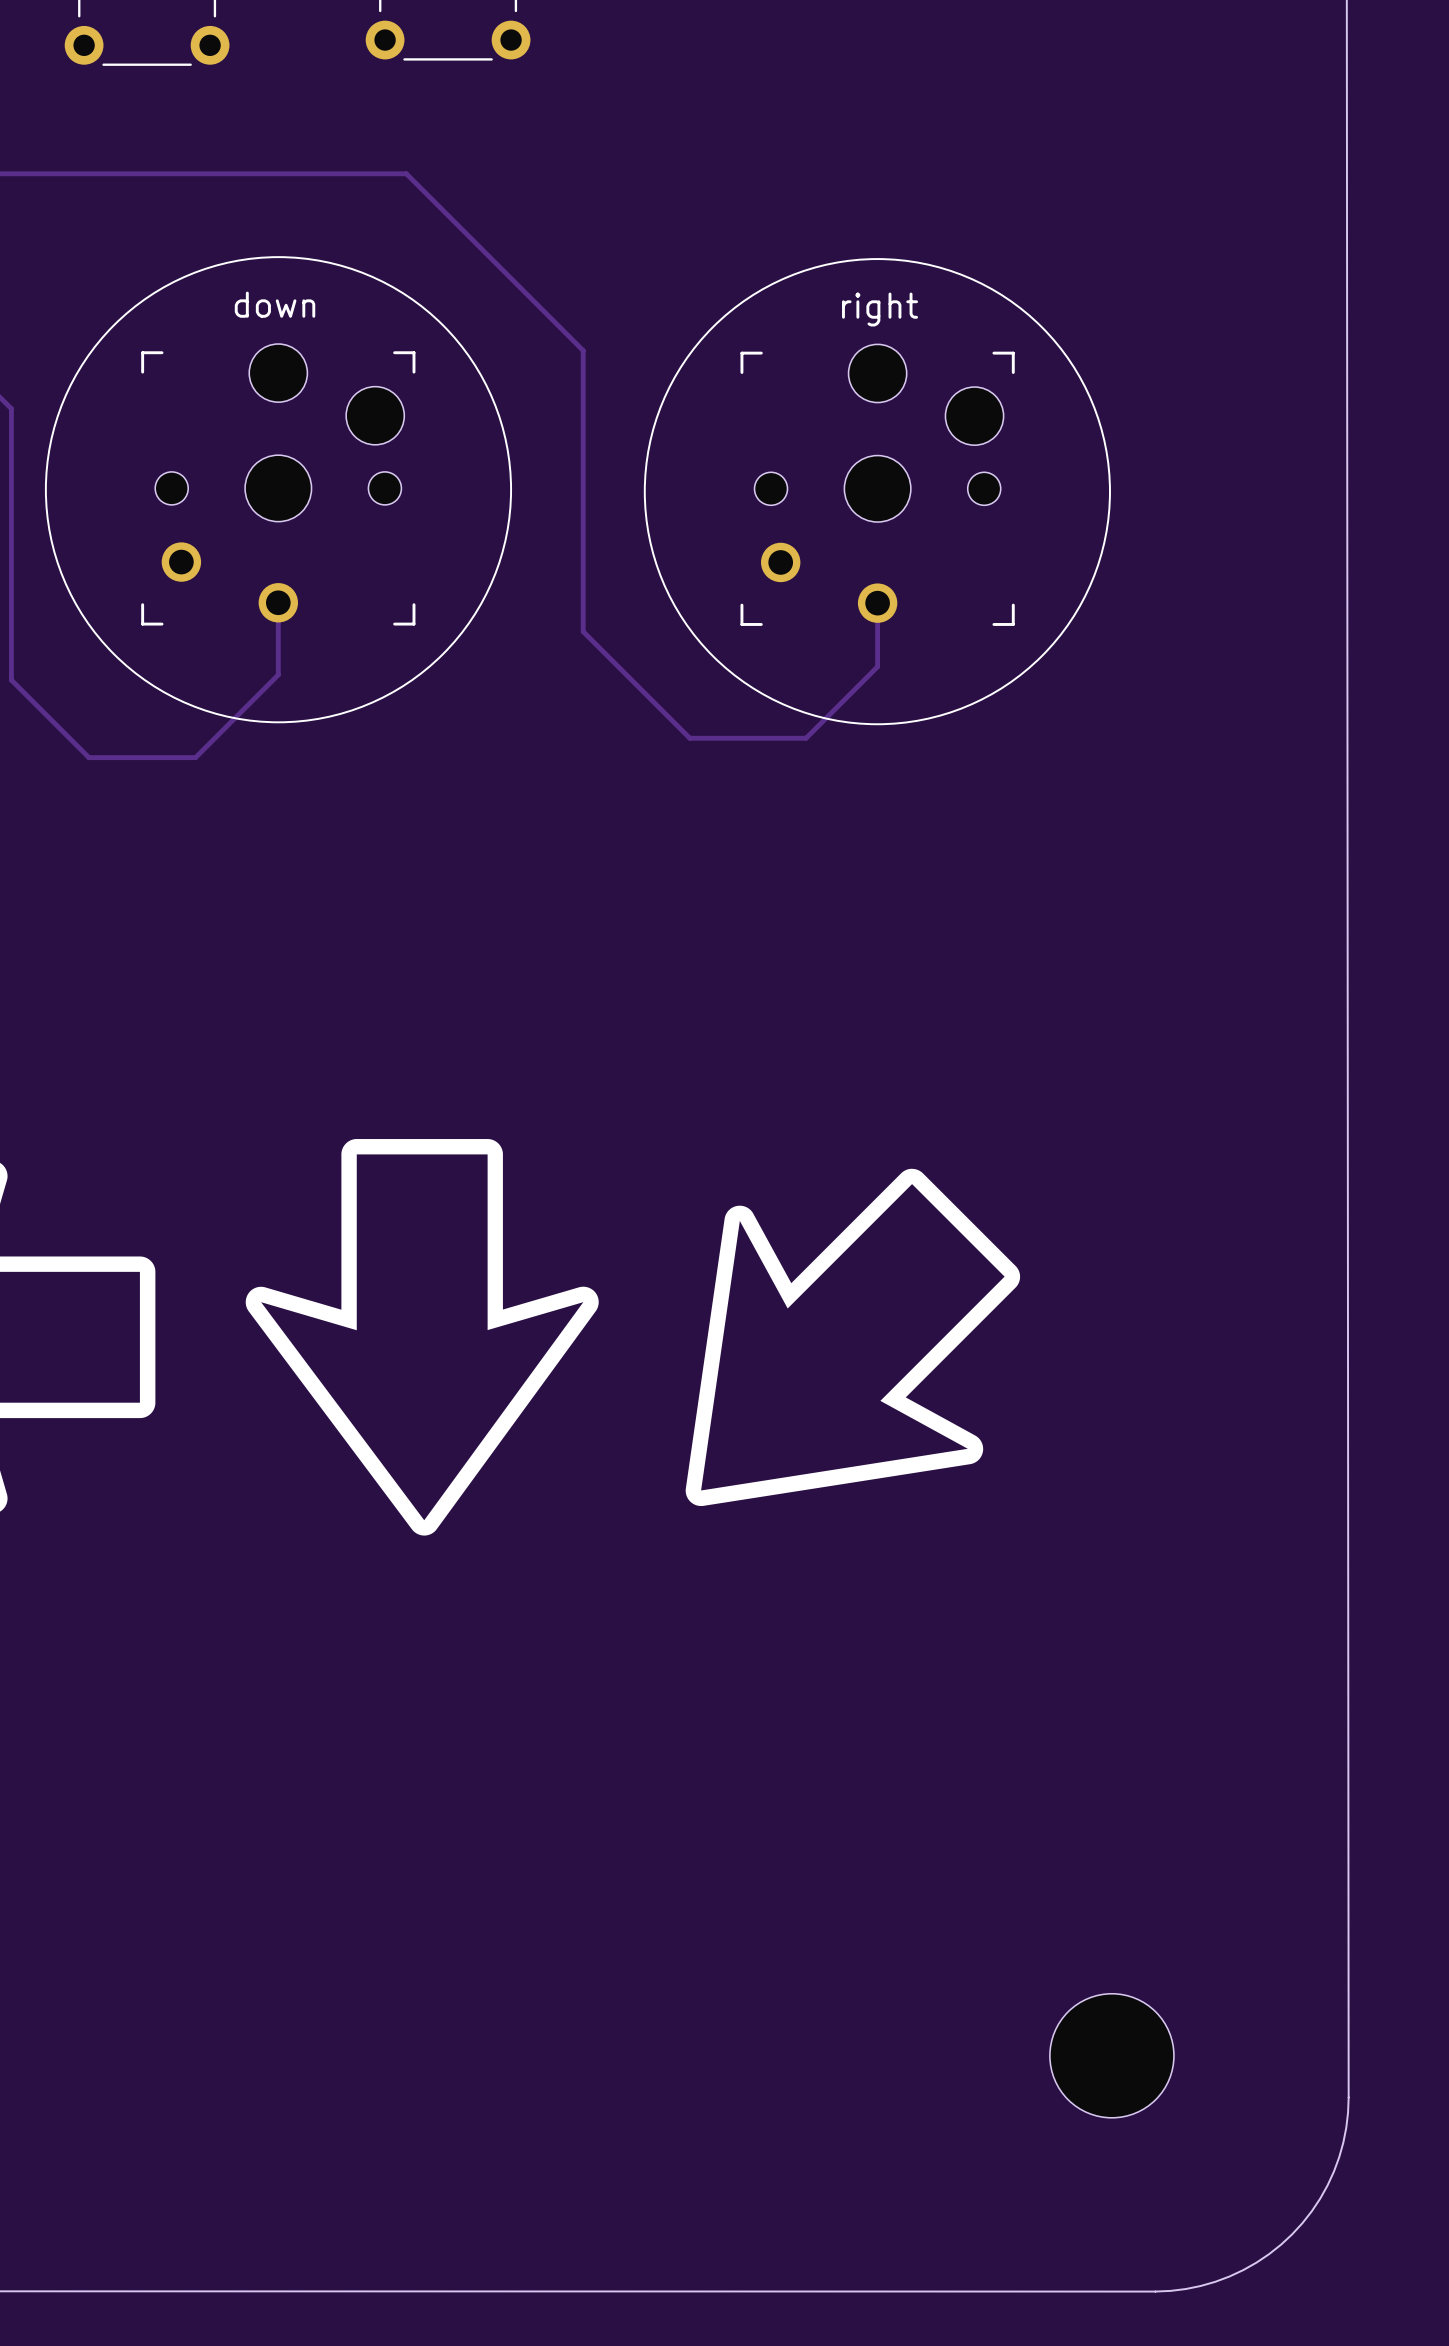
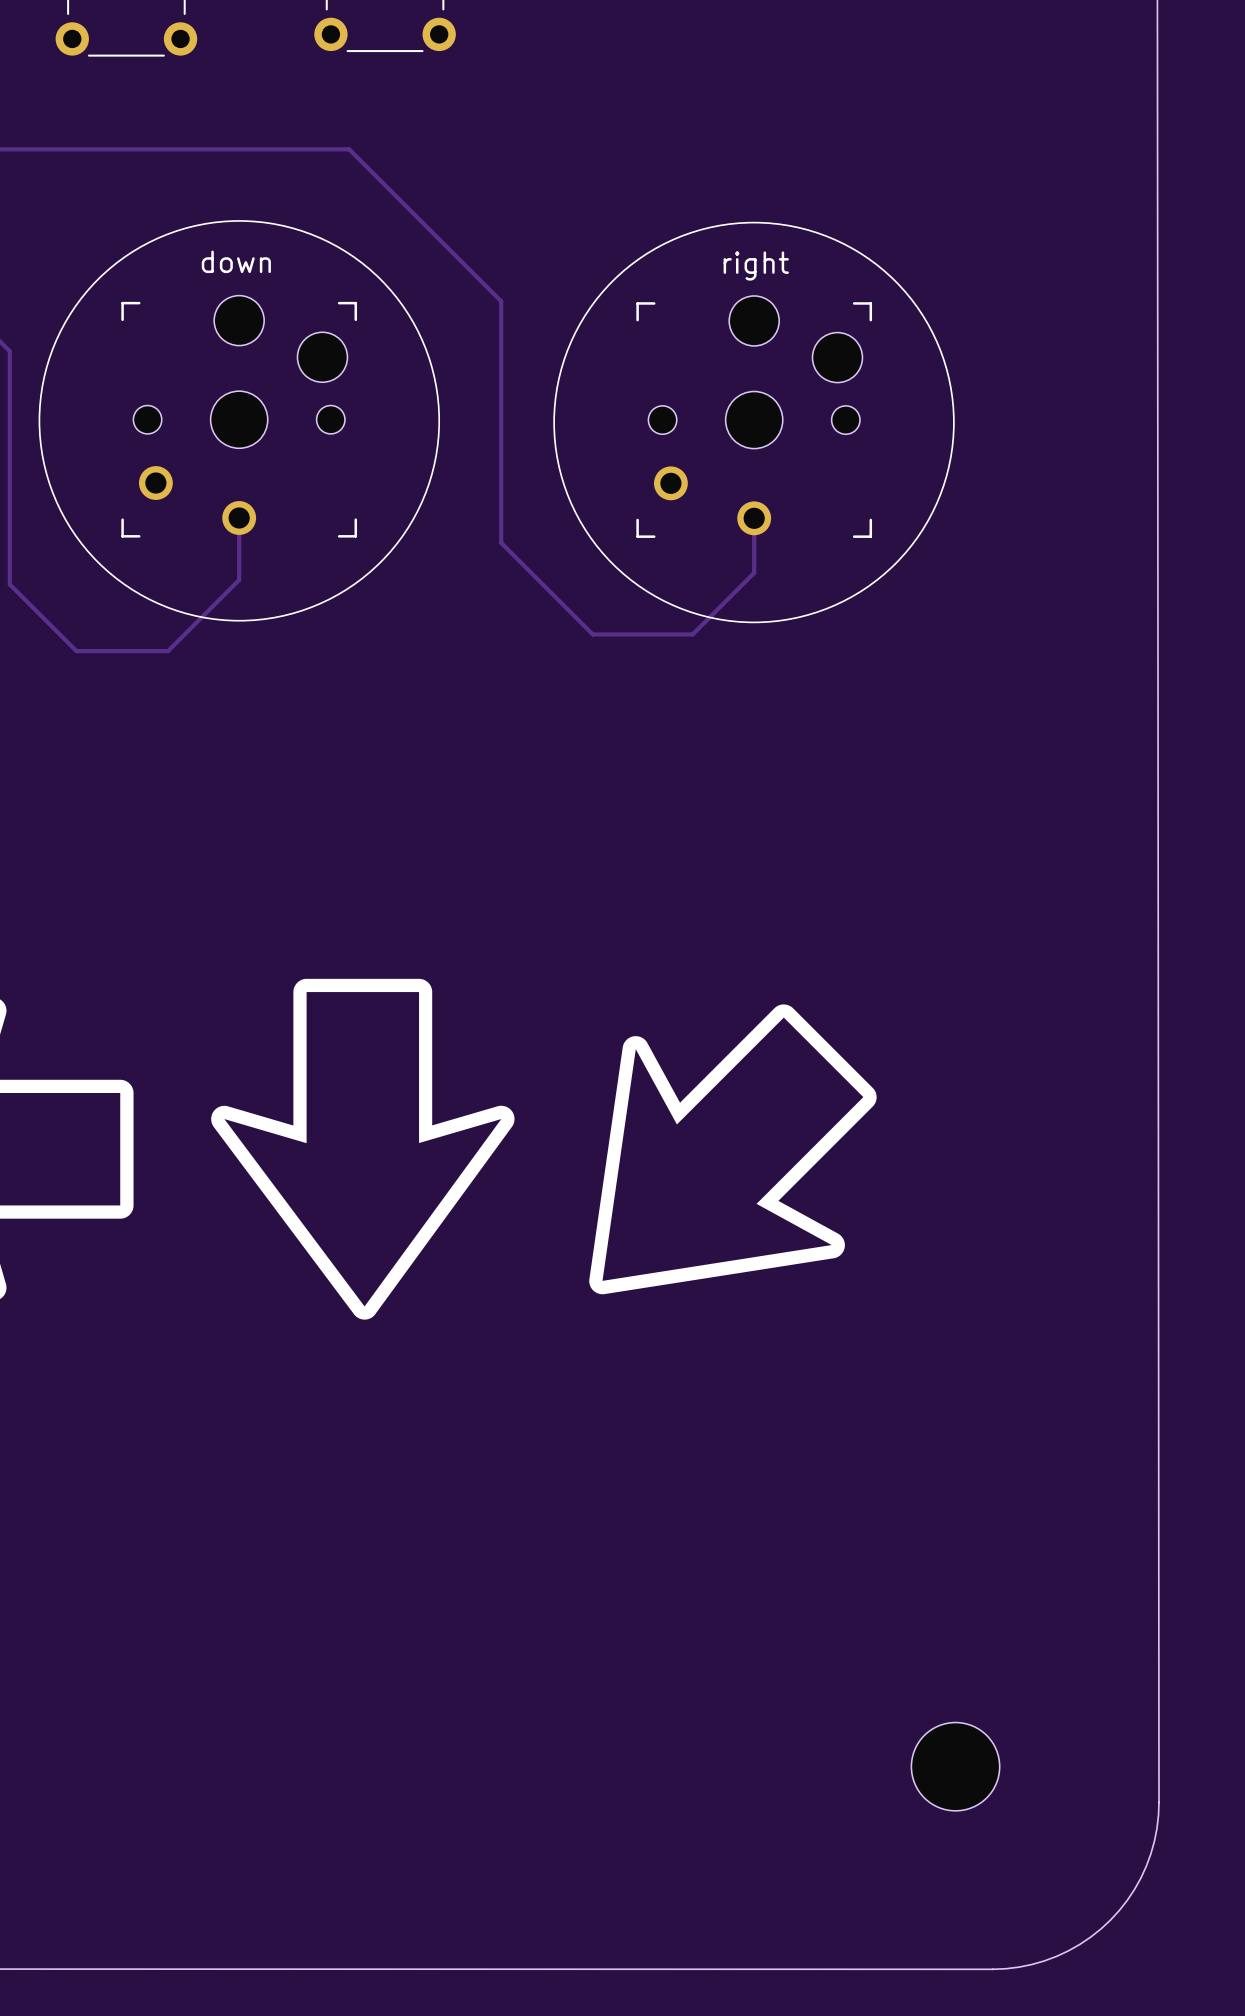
part footprint: [1049, 1993, 1174, 2118] -> [911, 1722, 1000, 1811]

